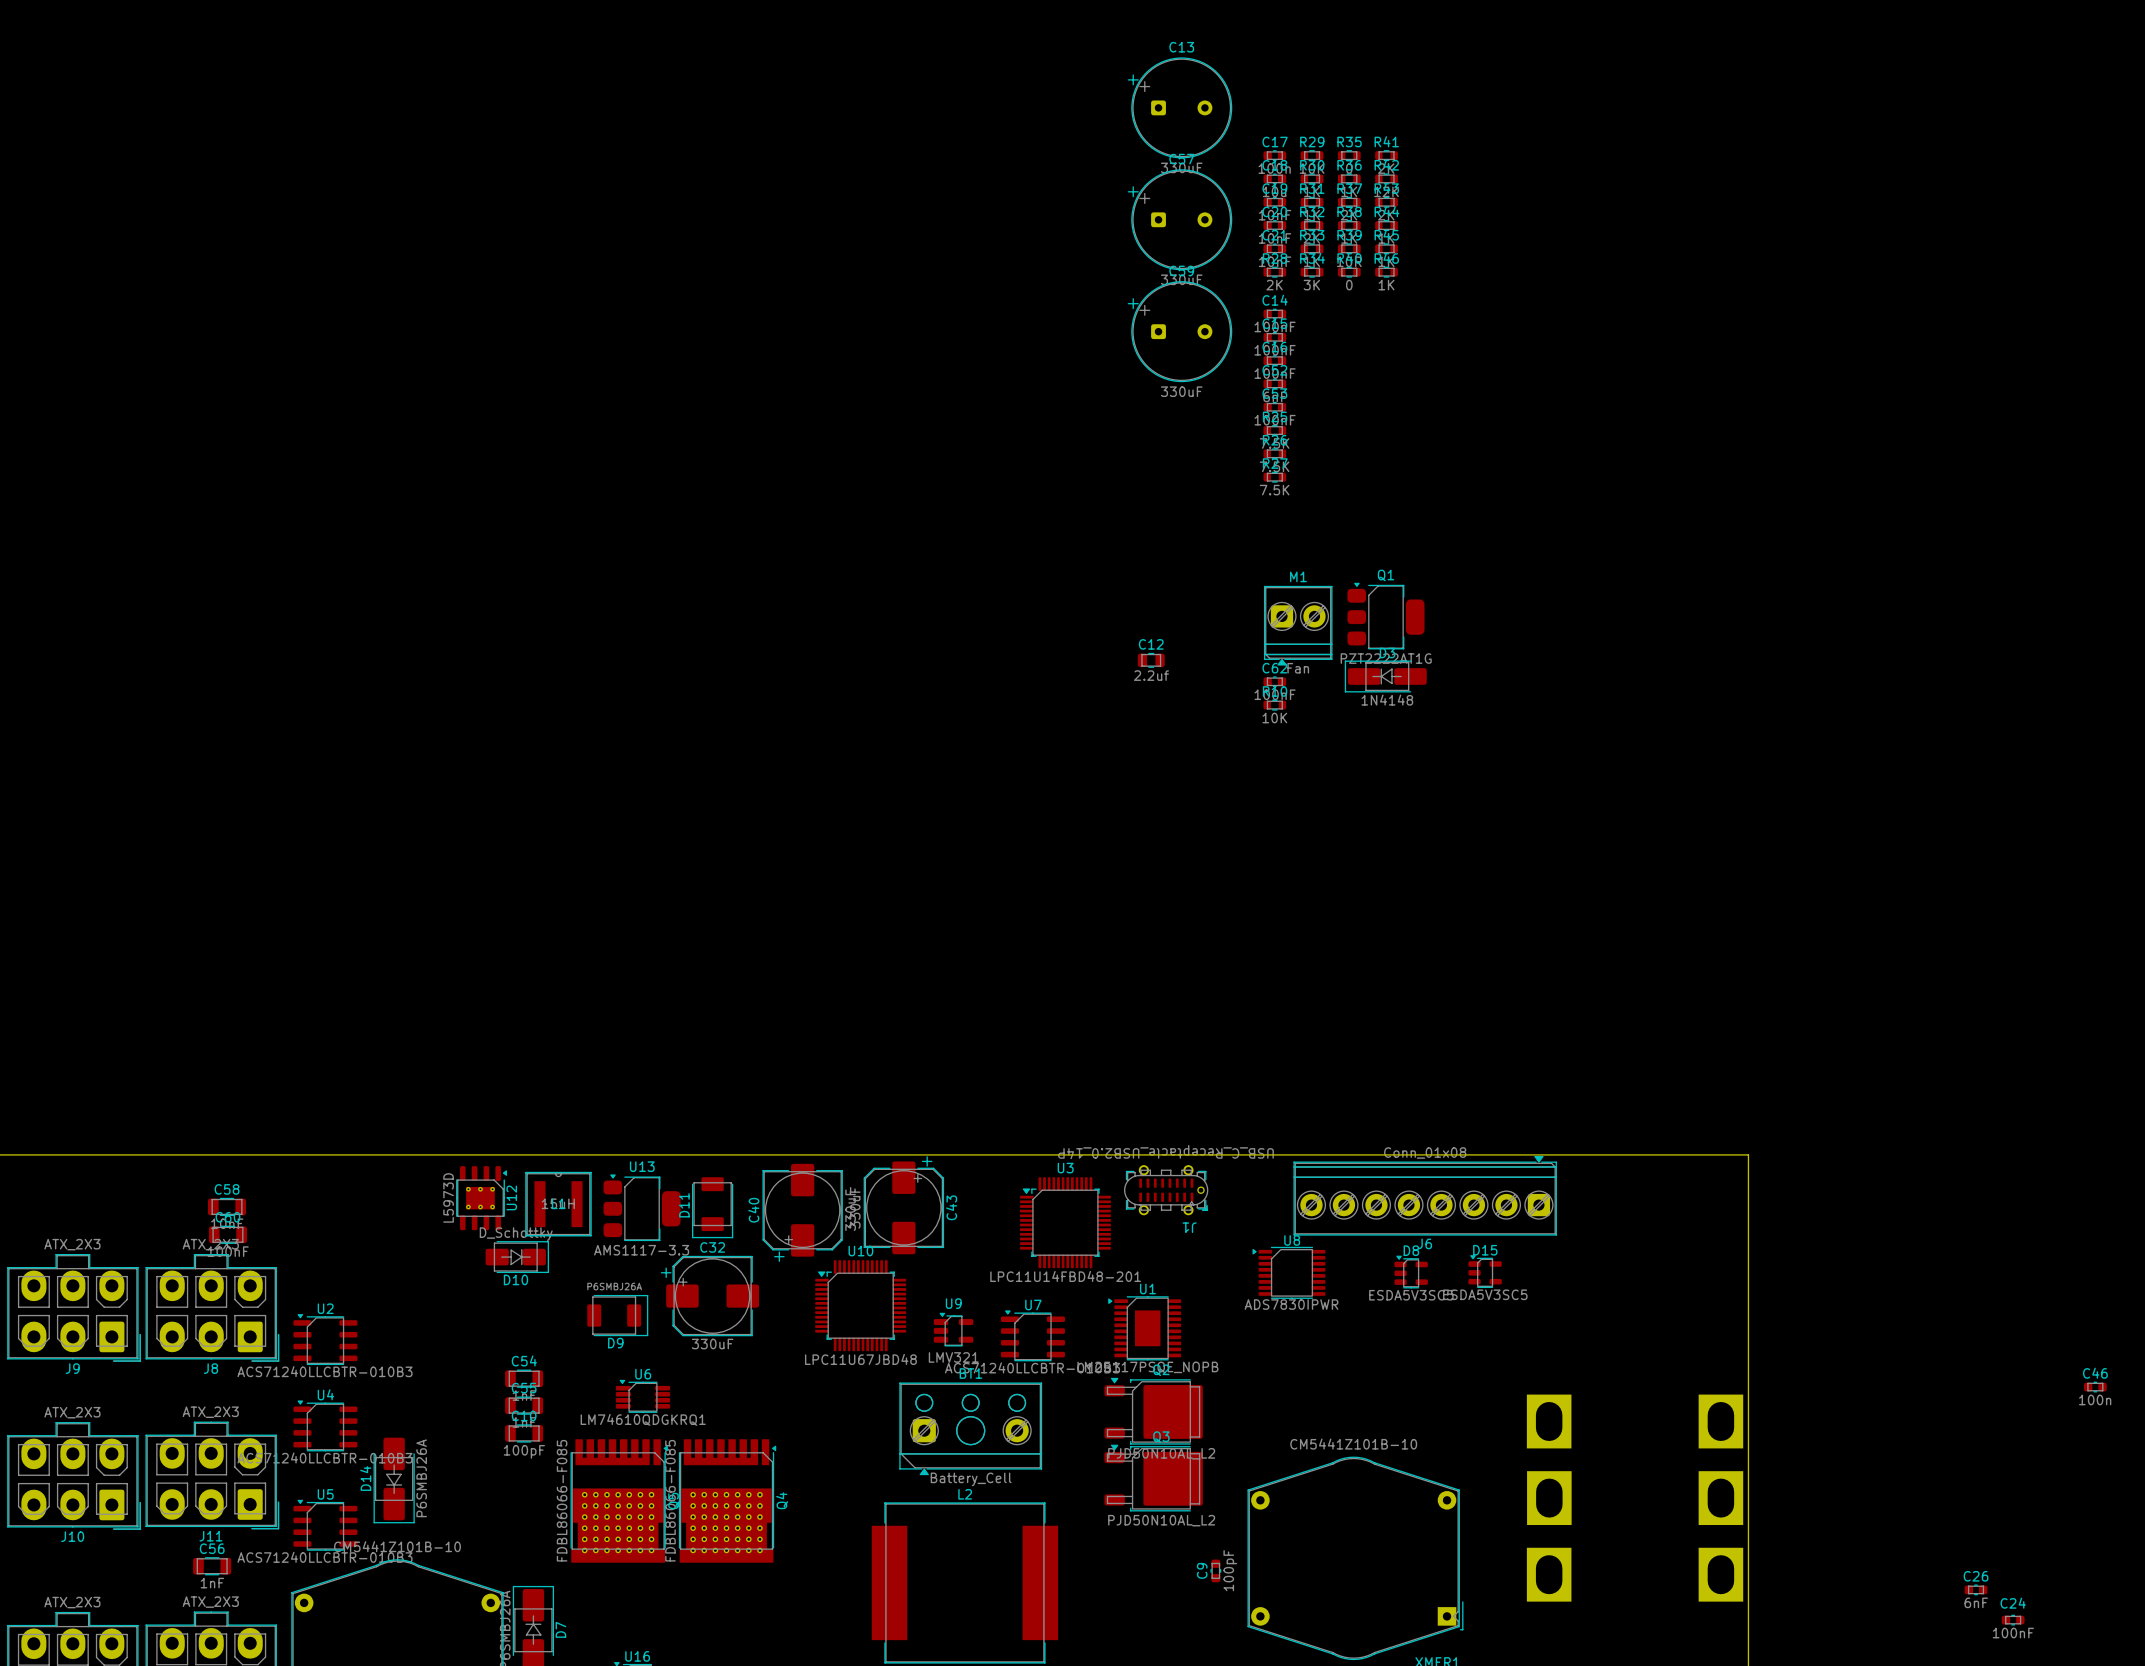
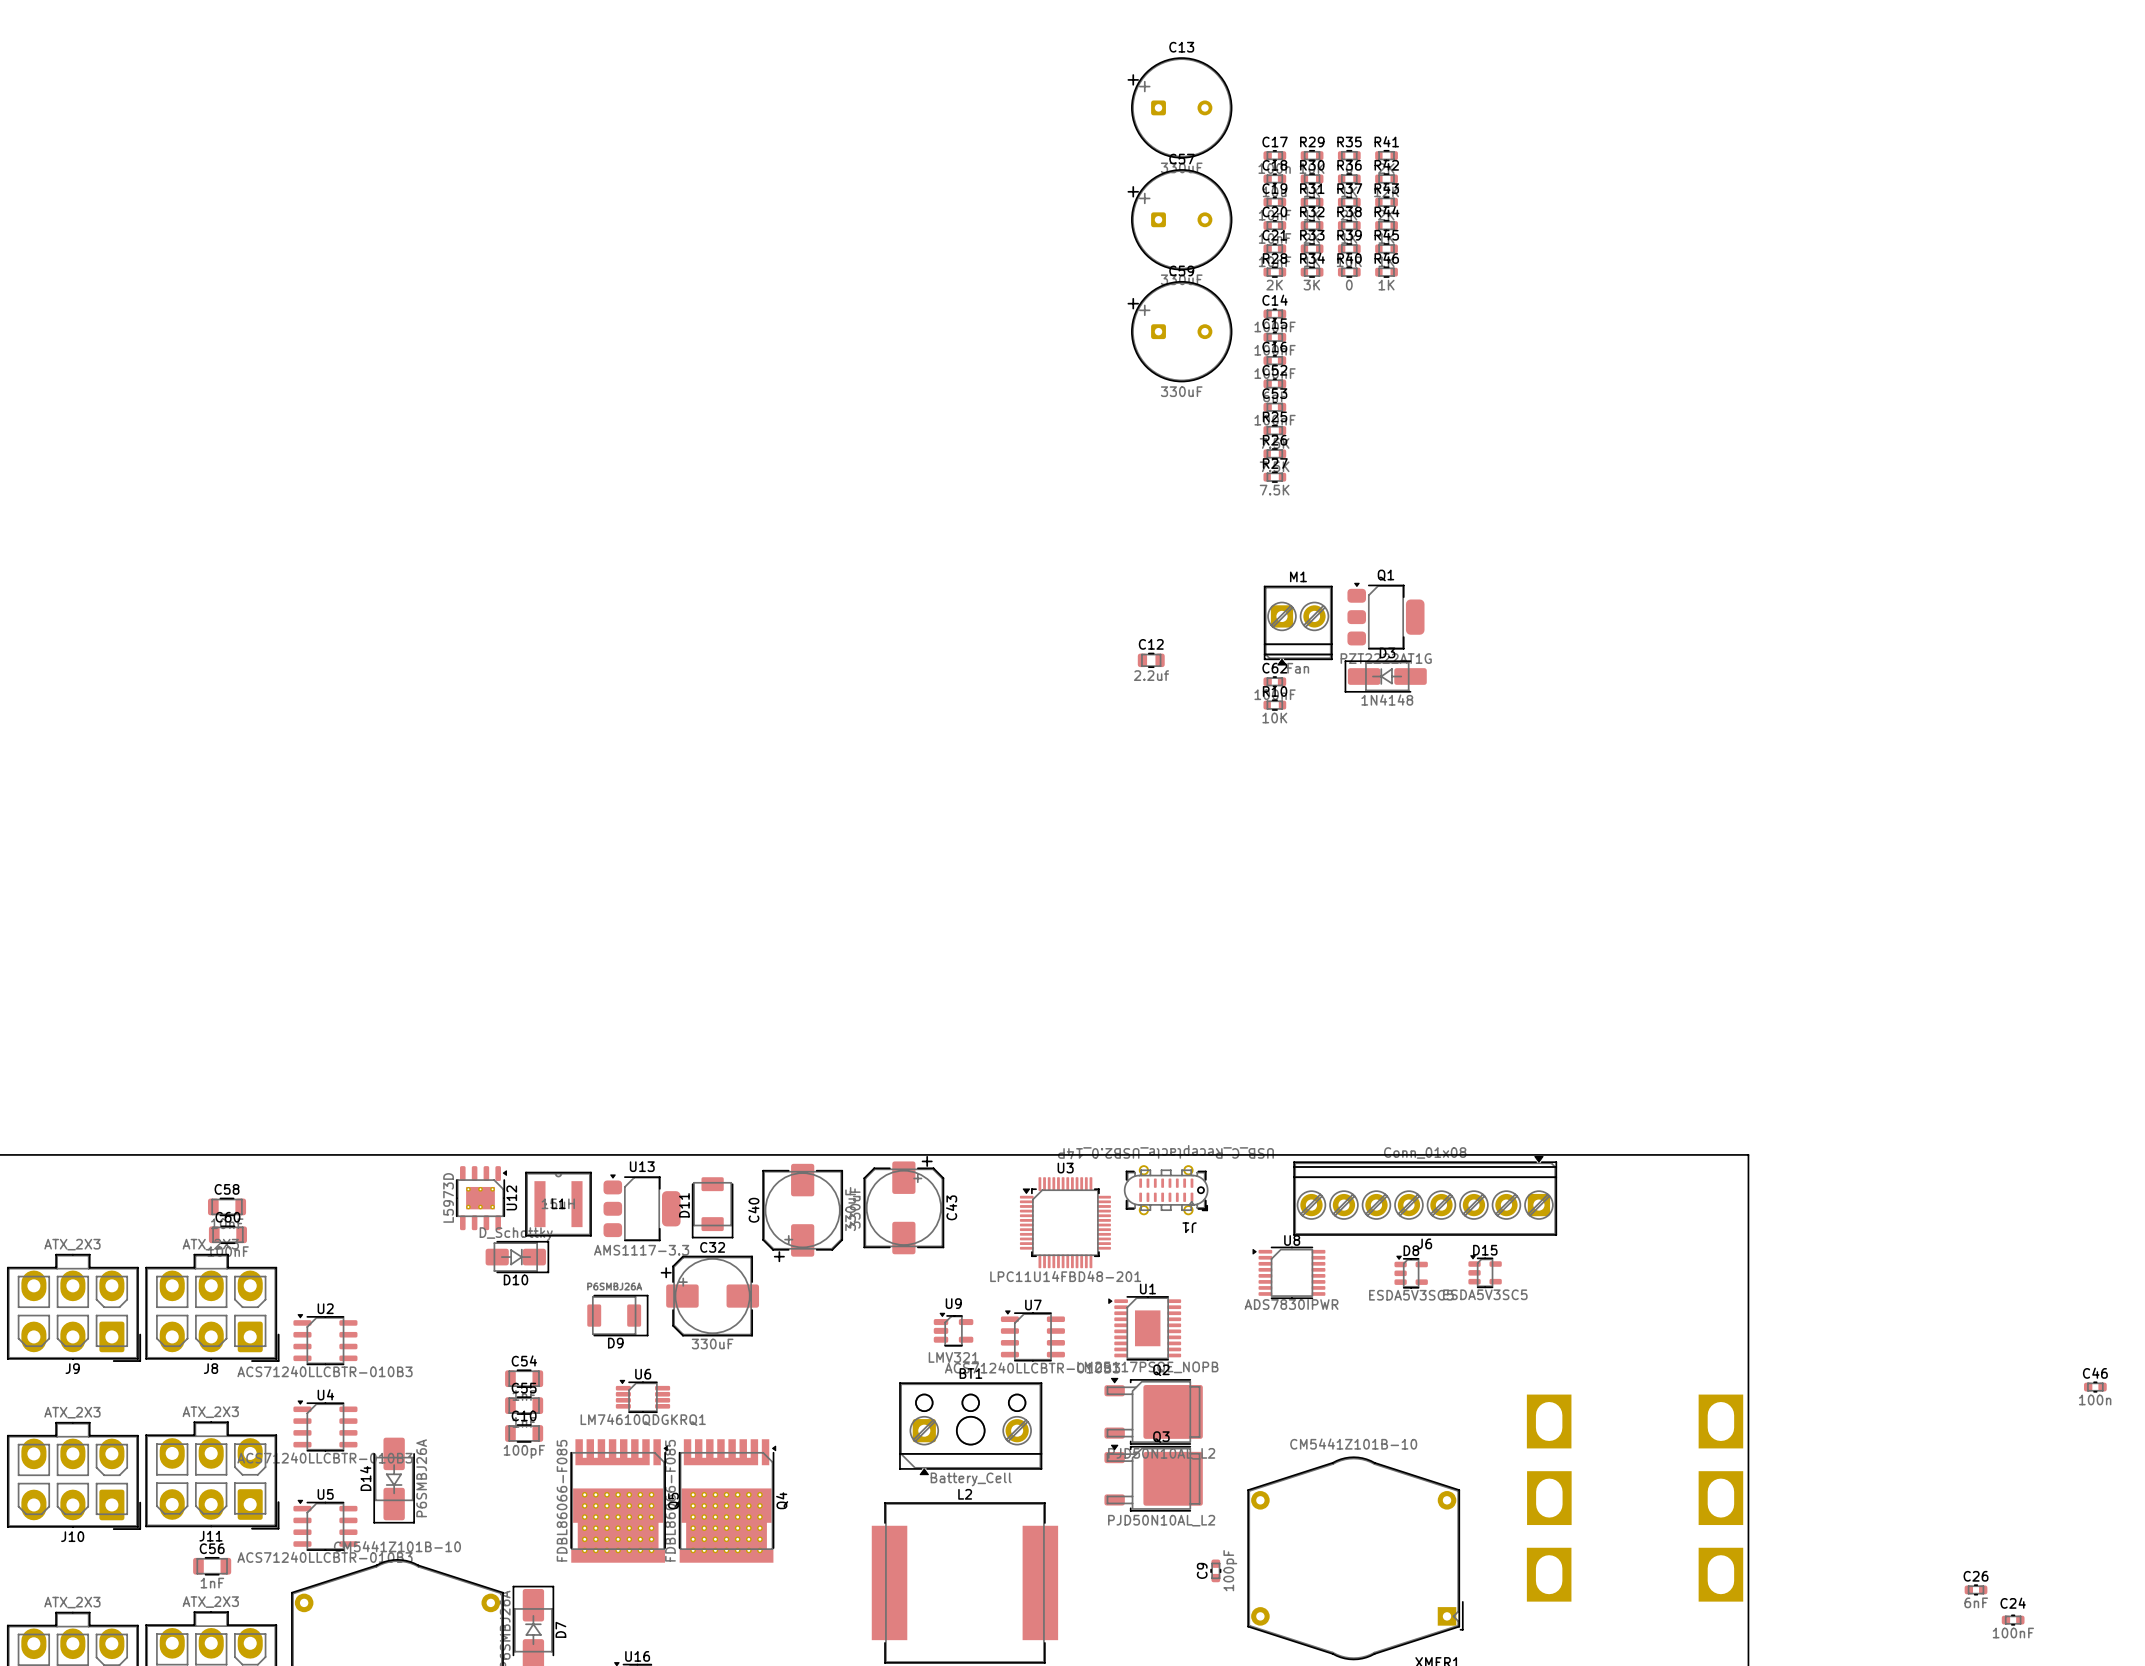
U10: LPC11U67JBD48 (860, 1305) -> none

